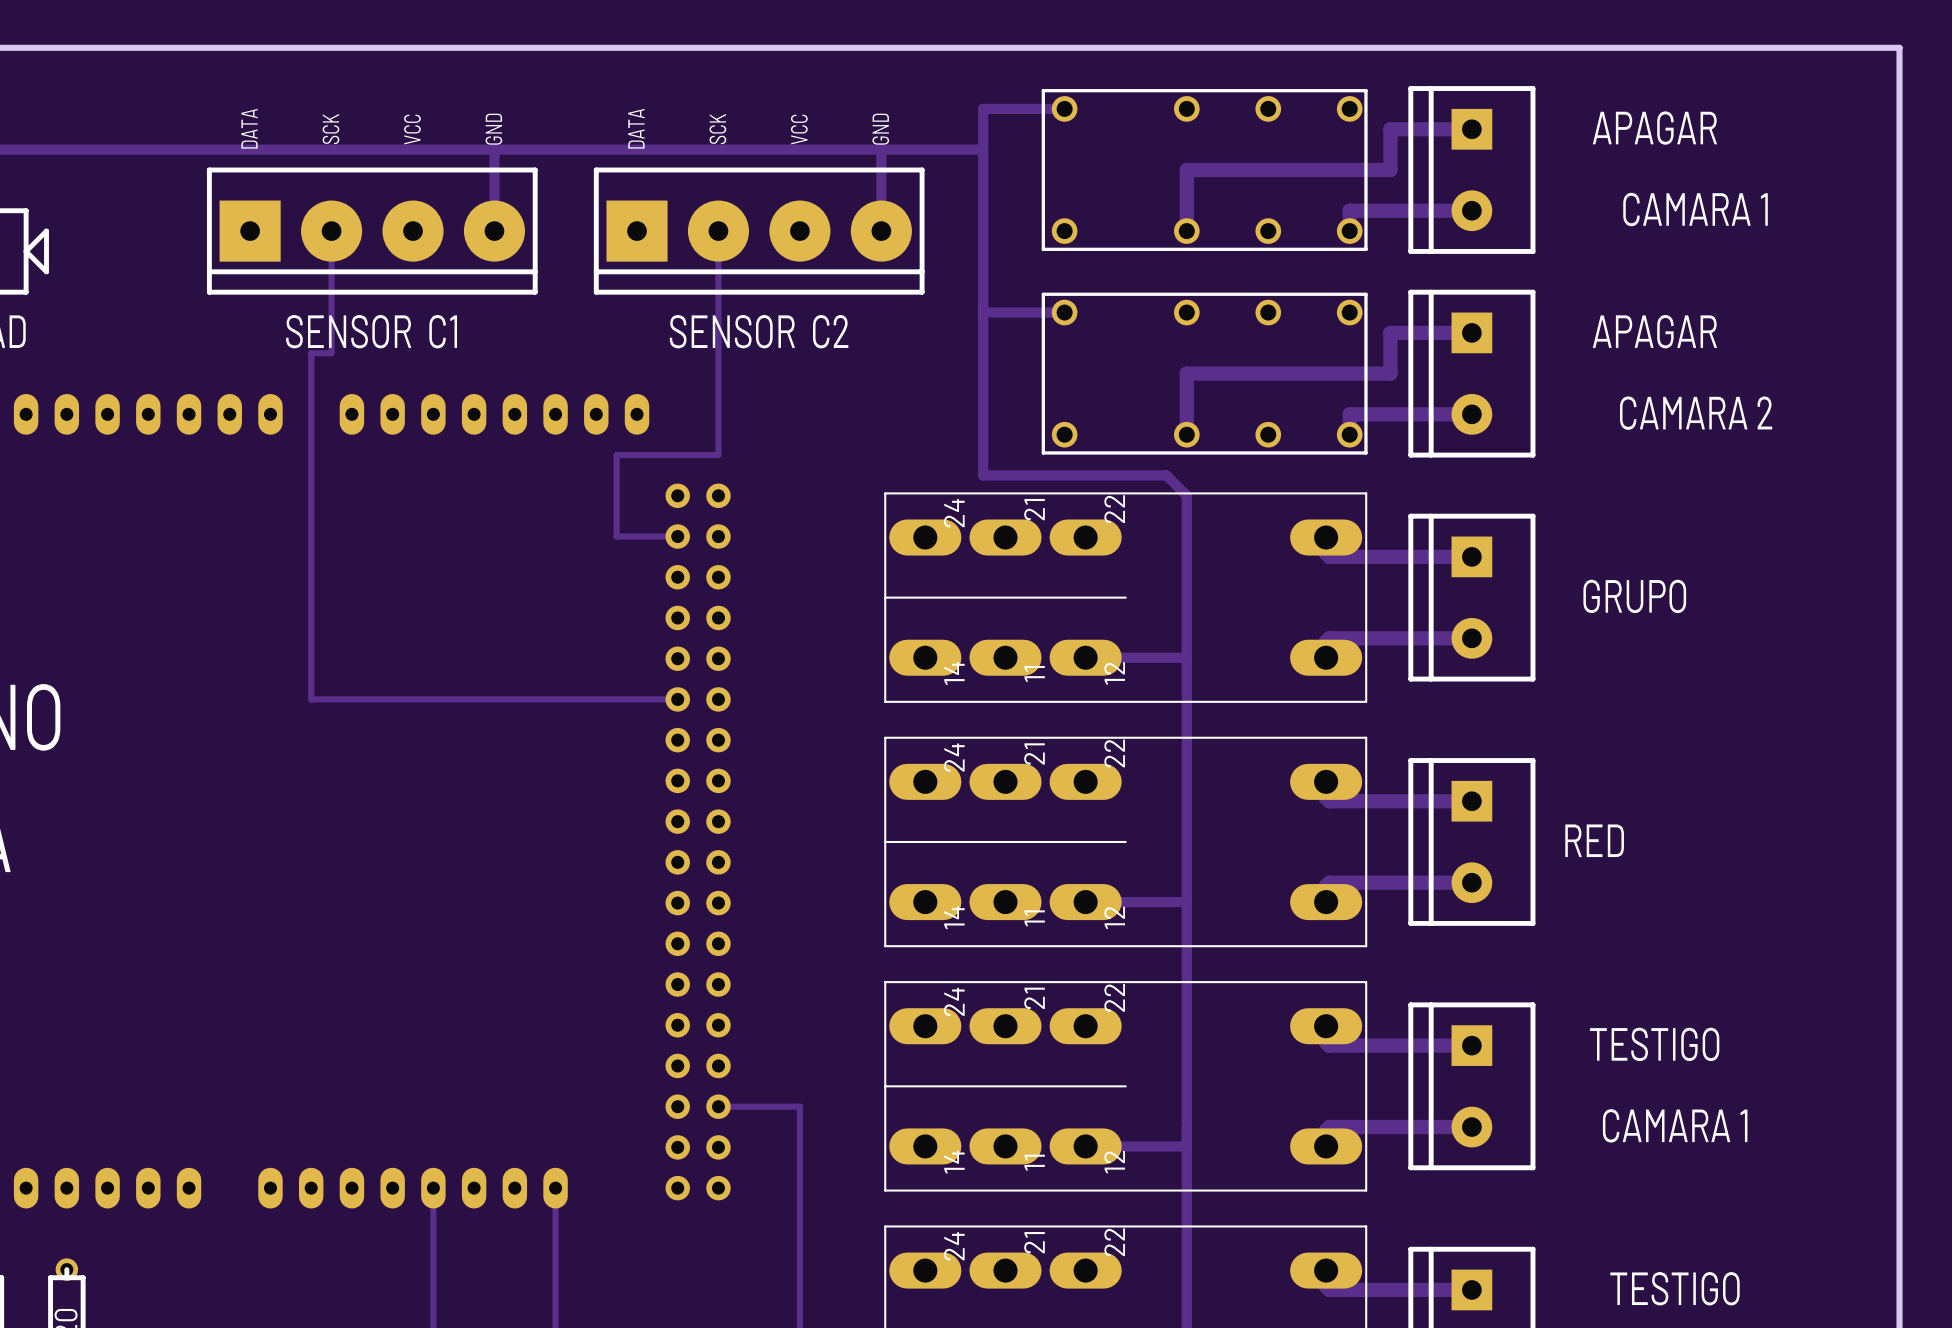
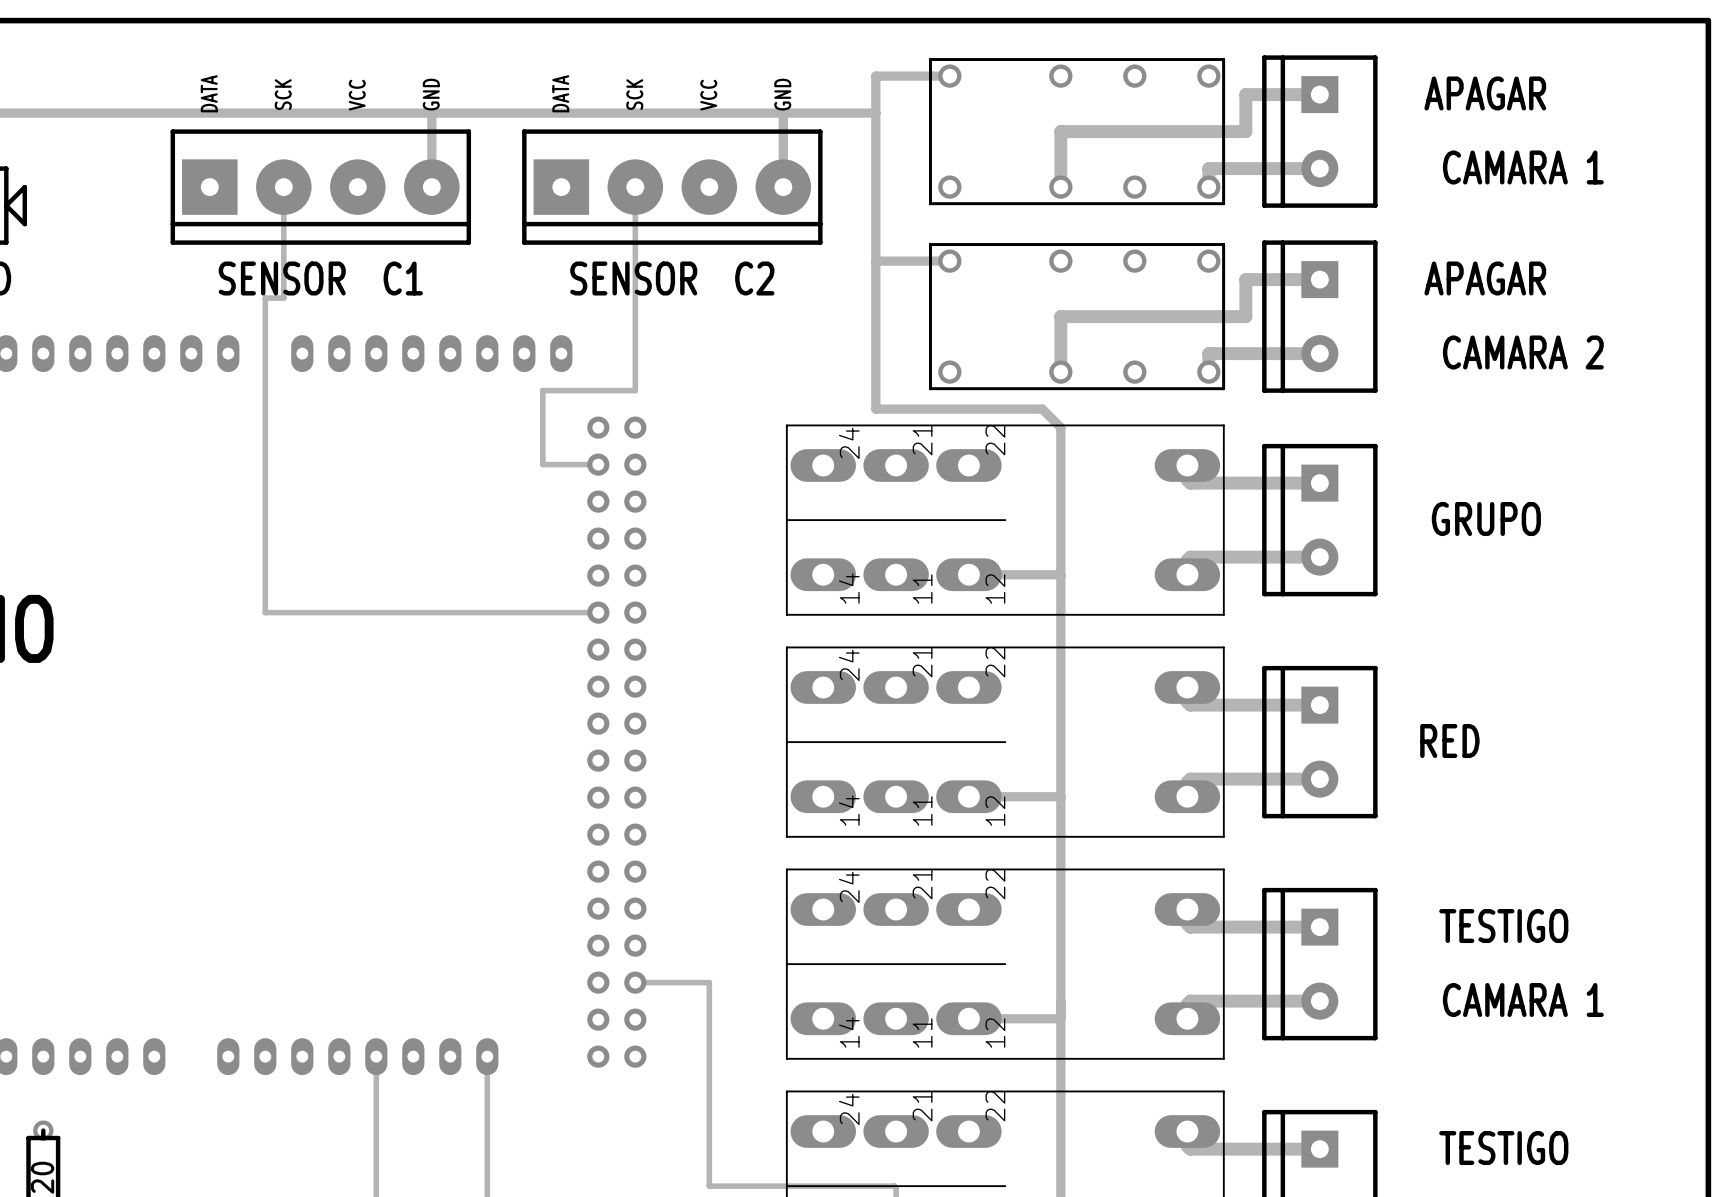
text position: GRUPO (1634, 596) -> GRUPO (1486, 519)
text position: RED (1594, 840) -> RED (1449, 741)
text position: TESTIGO (1654, 1044) -> TESTIGO (1503, 926)
text position: CAMARA 1 (1675, 1125) -> CAMARA 1 (1523, 1000)

